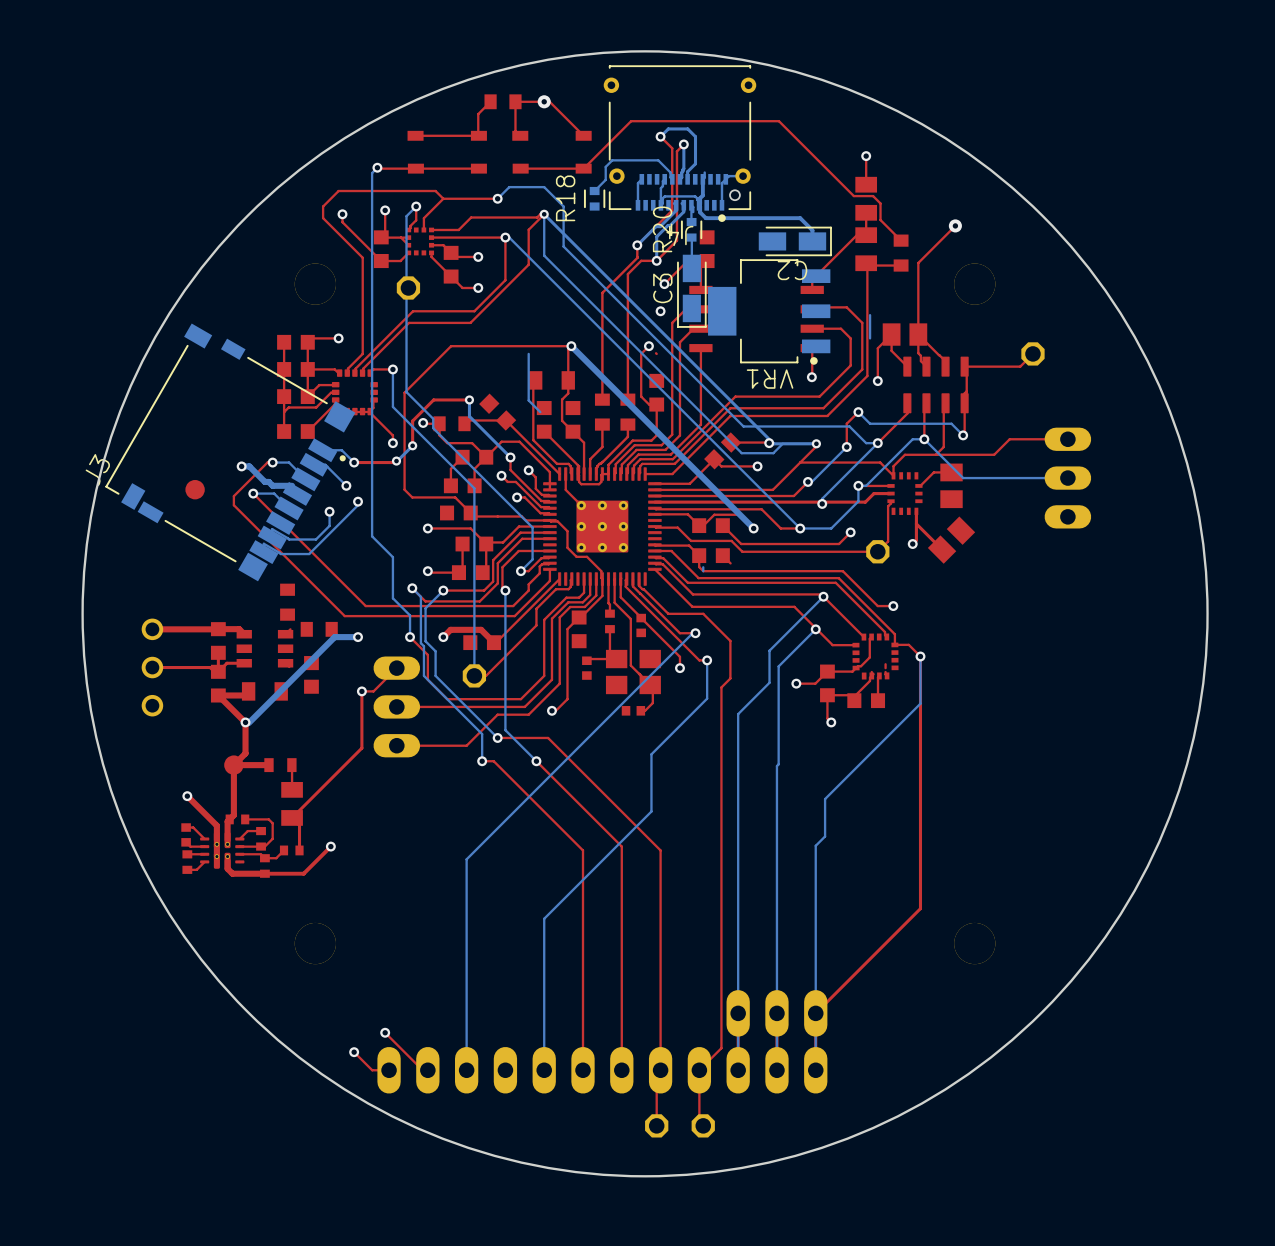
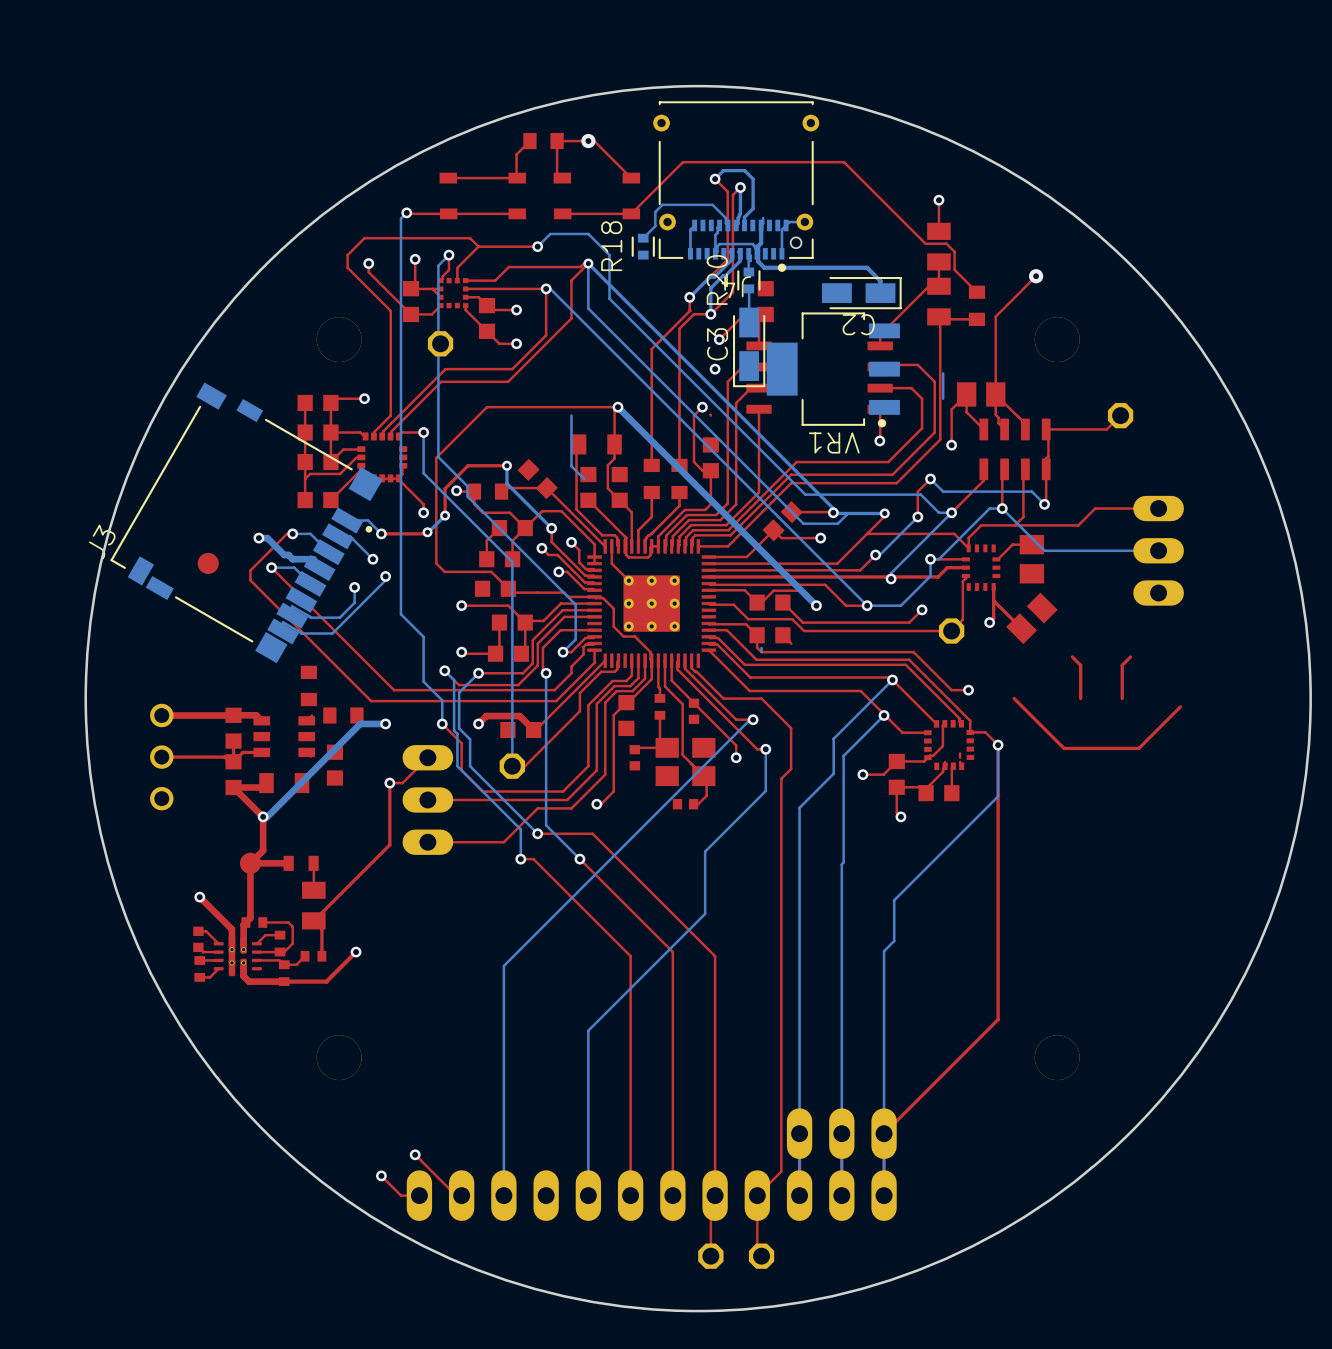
top track: none -> (1072, 656) (1080, 665) (1080, 698)
top track: none -> (1130, 656) (1122, 665) (1122, 698)
top track: none -> (1014, 698) (1064, 748) (1138, 748) (1180, 706)

